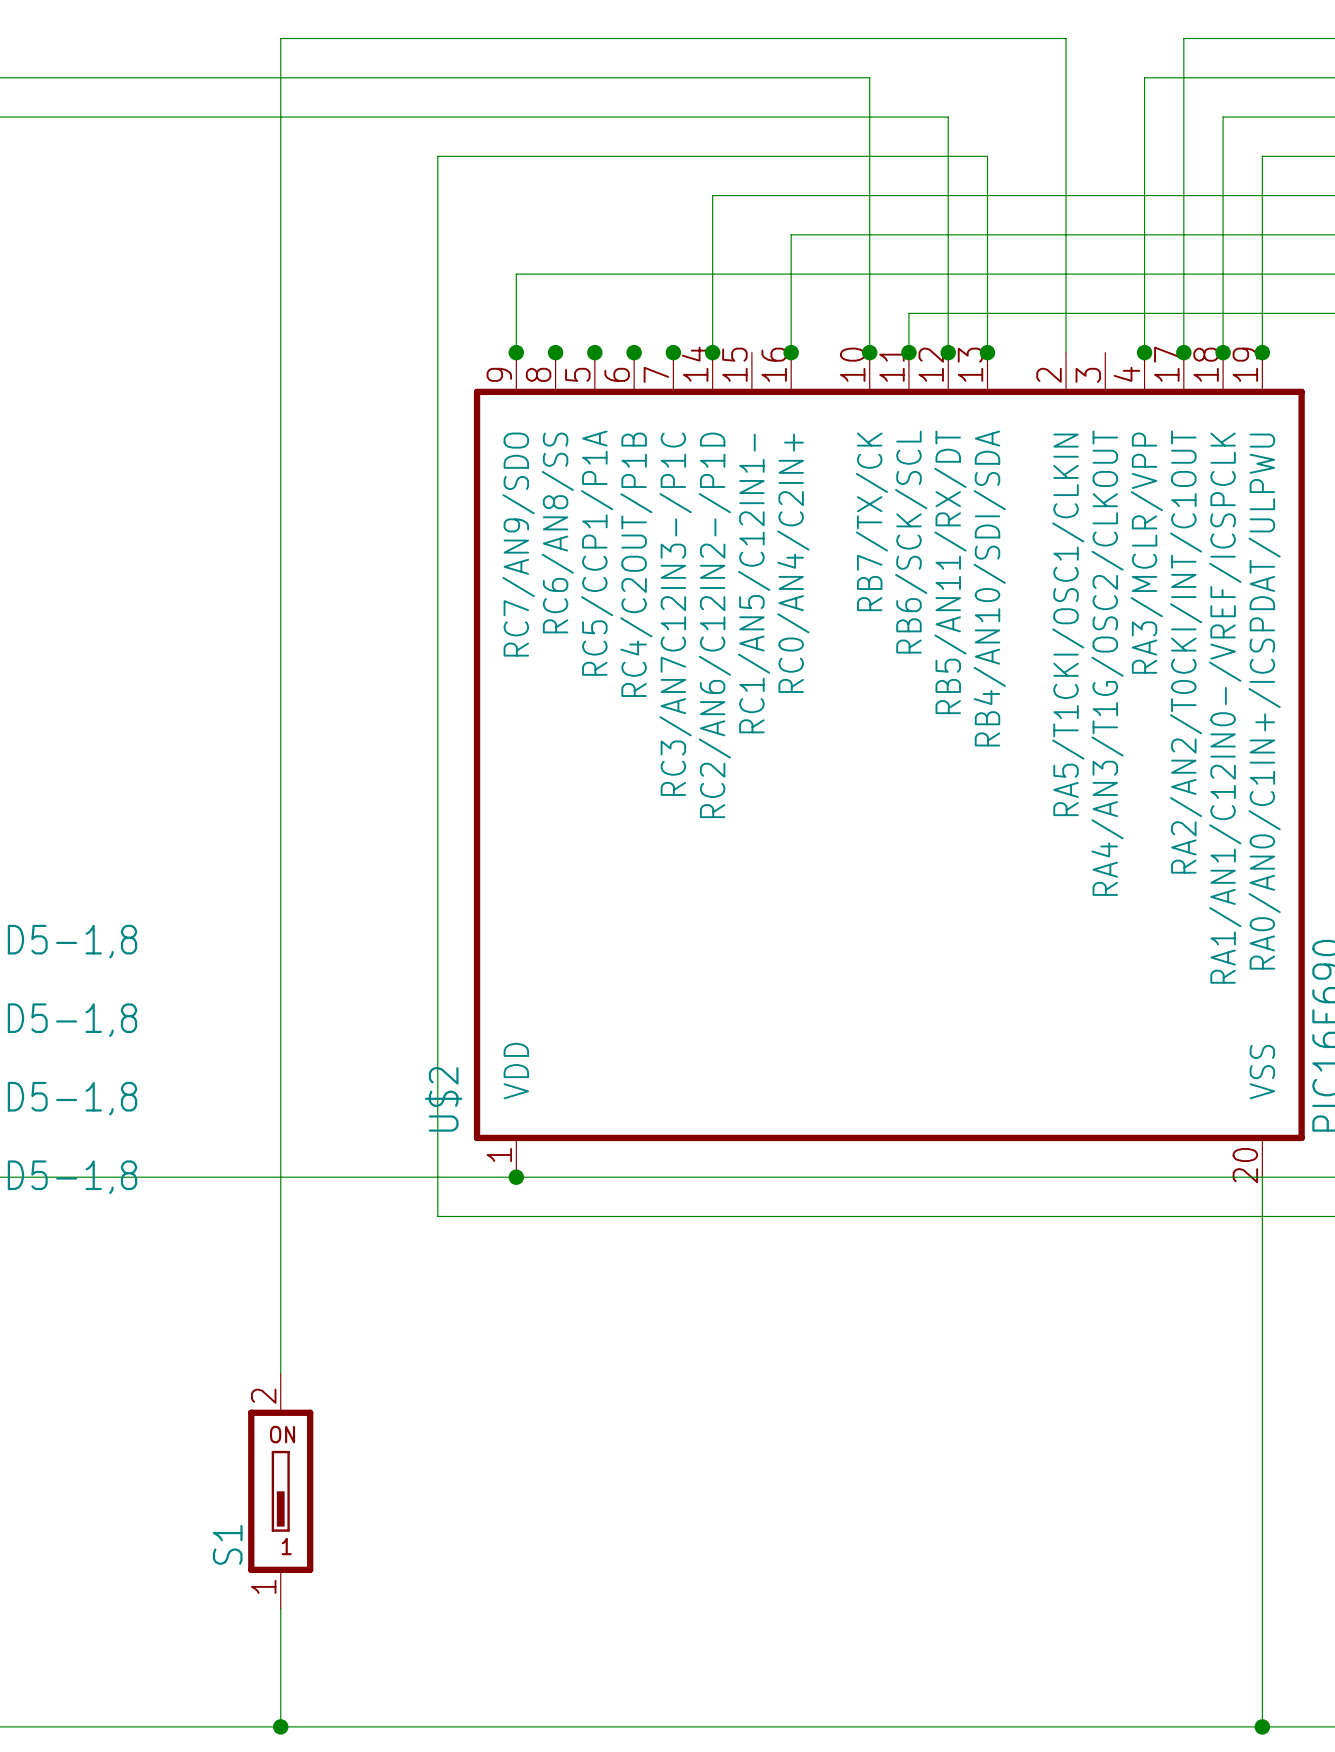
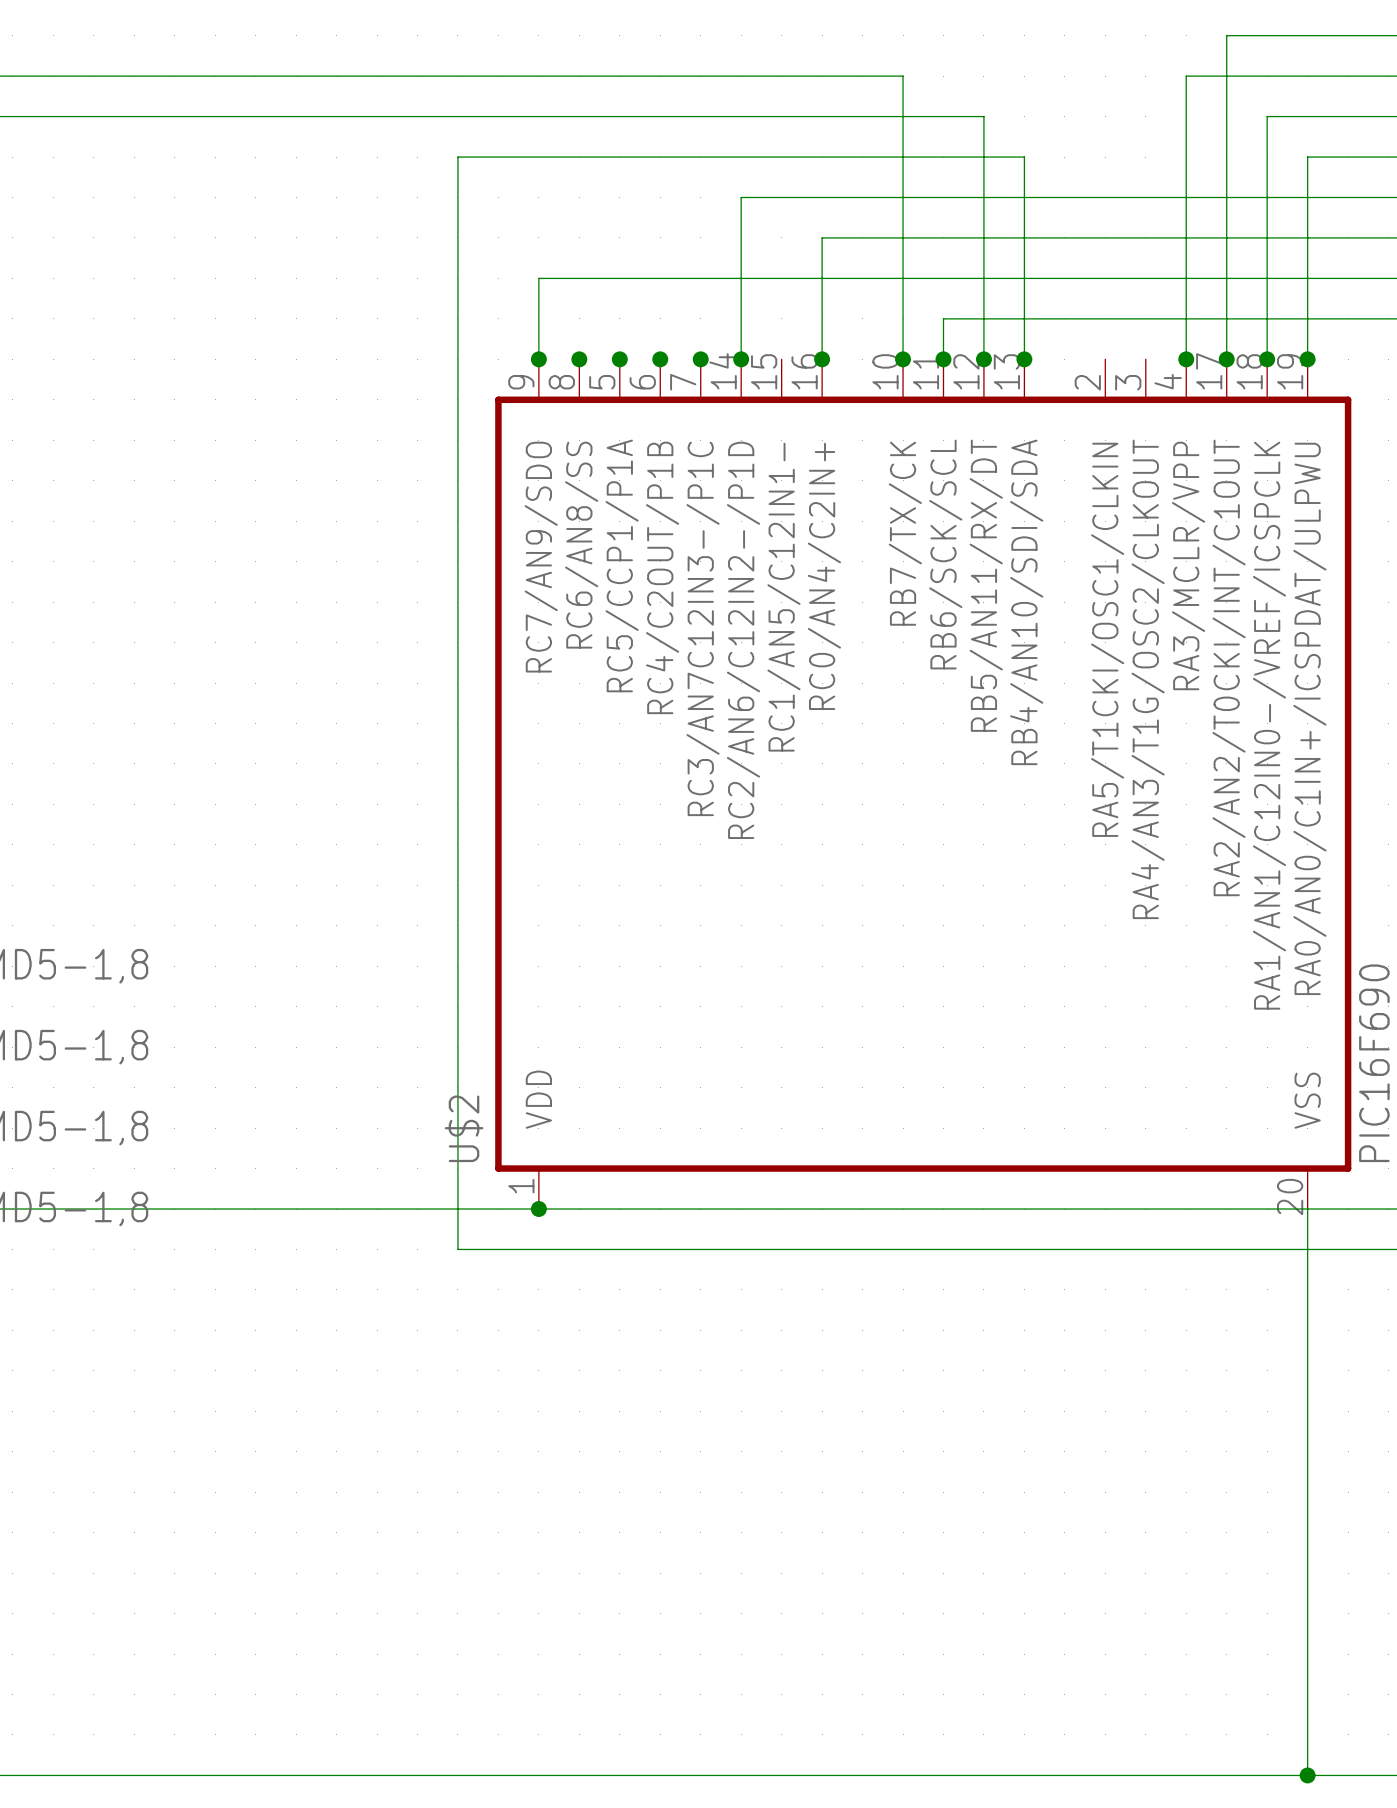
wire: (1066, 352) (1066, 38) (280, 38) (280, 1373) -> none
S1: (280, 1491) -> none
wire: (280, 1609) (280, 1726) -> none
junction: (280, 1726) -> none

